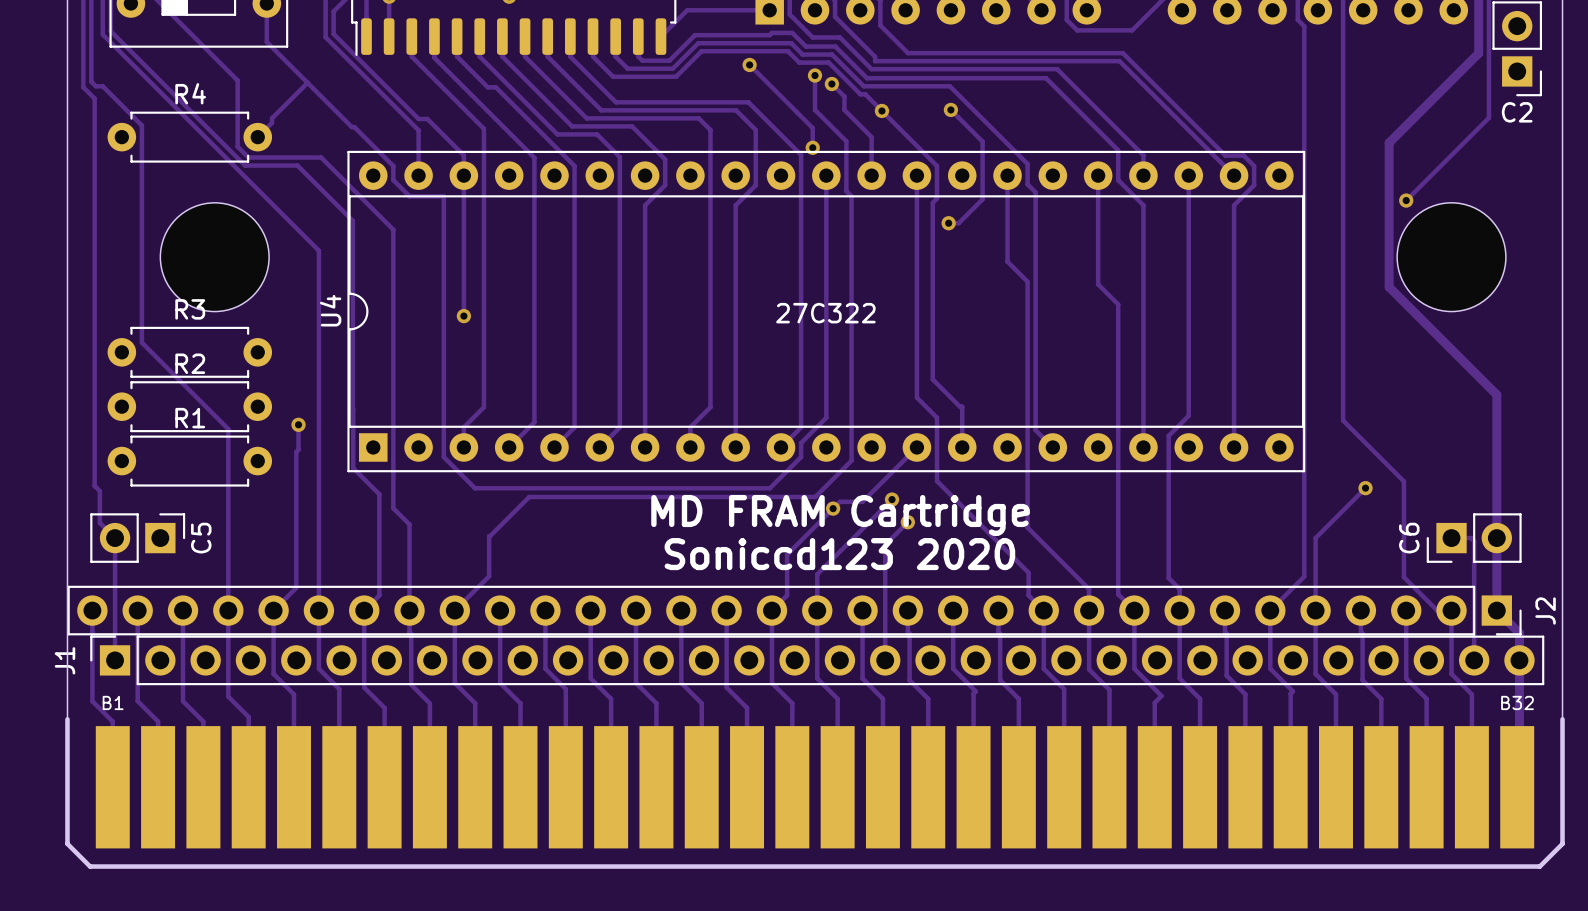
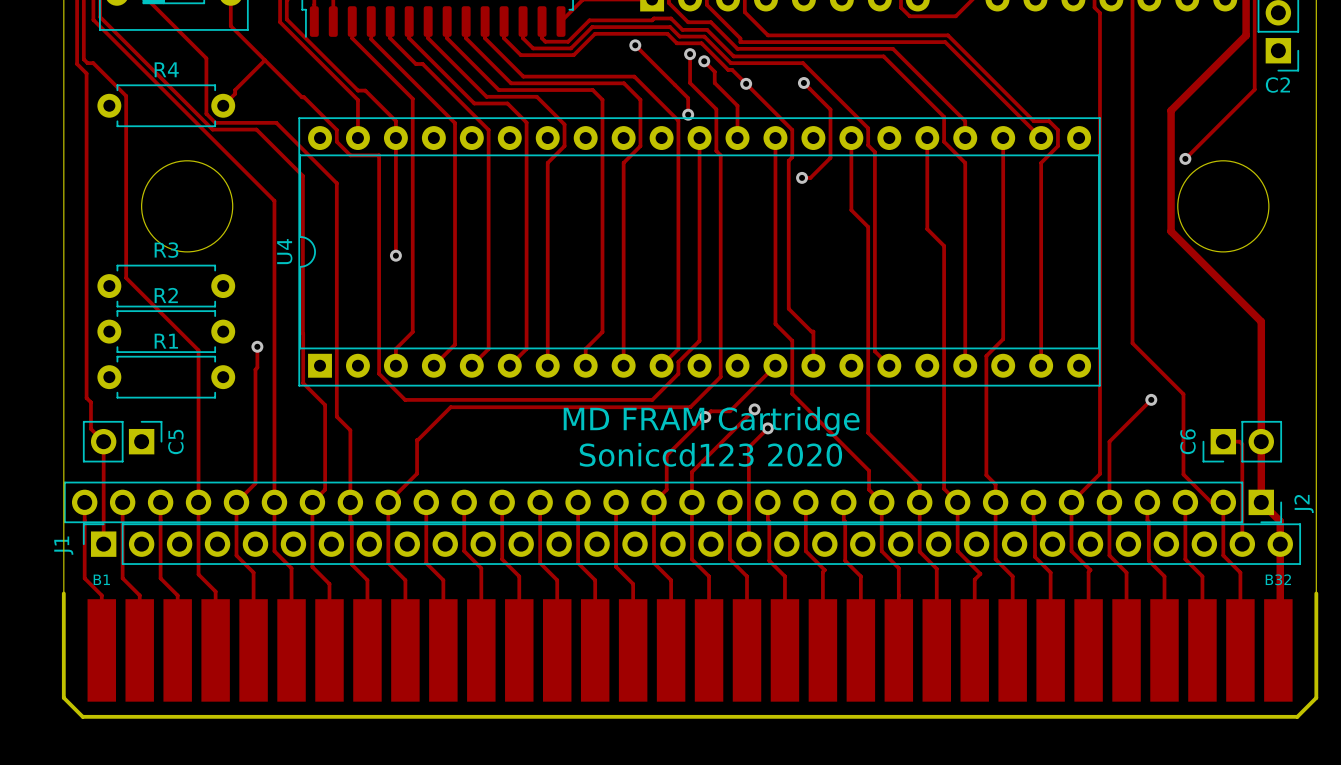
text: 27C322 (825, 313) -> none

